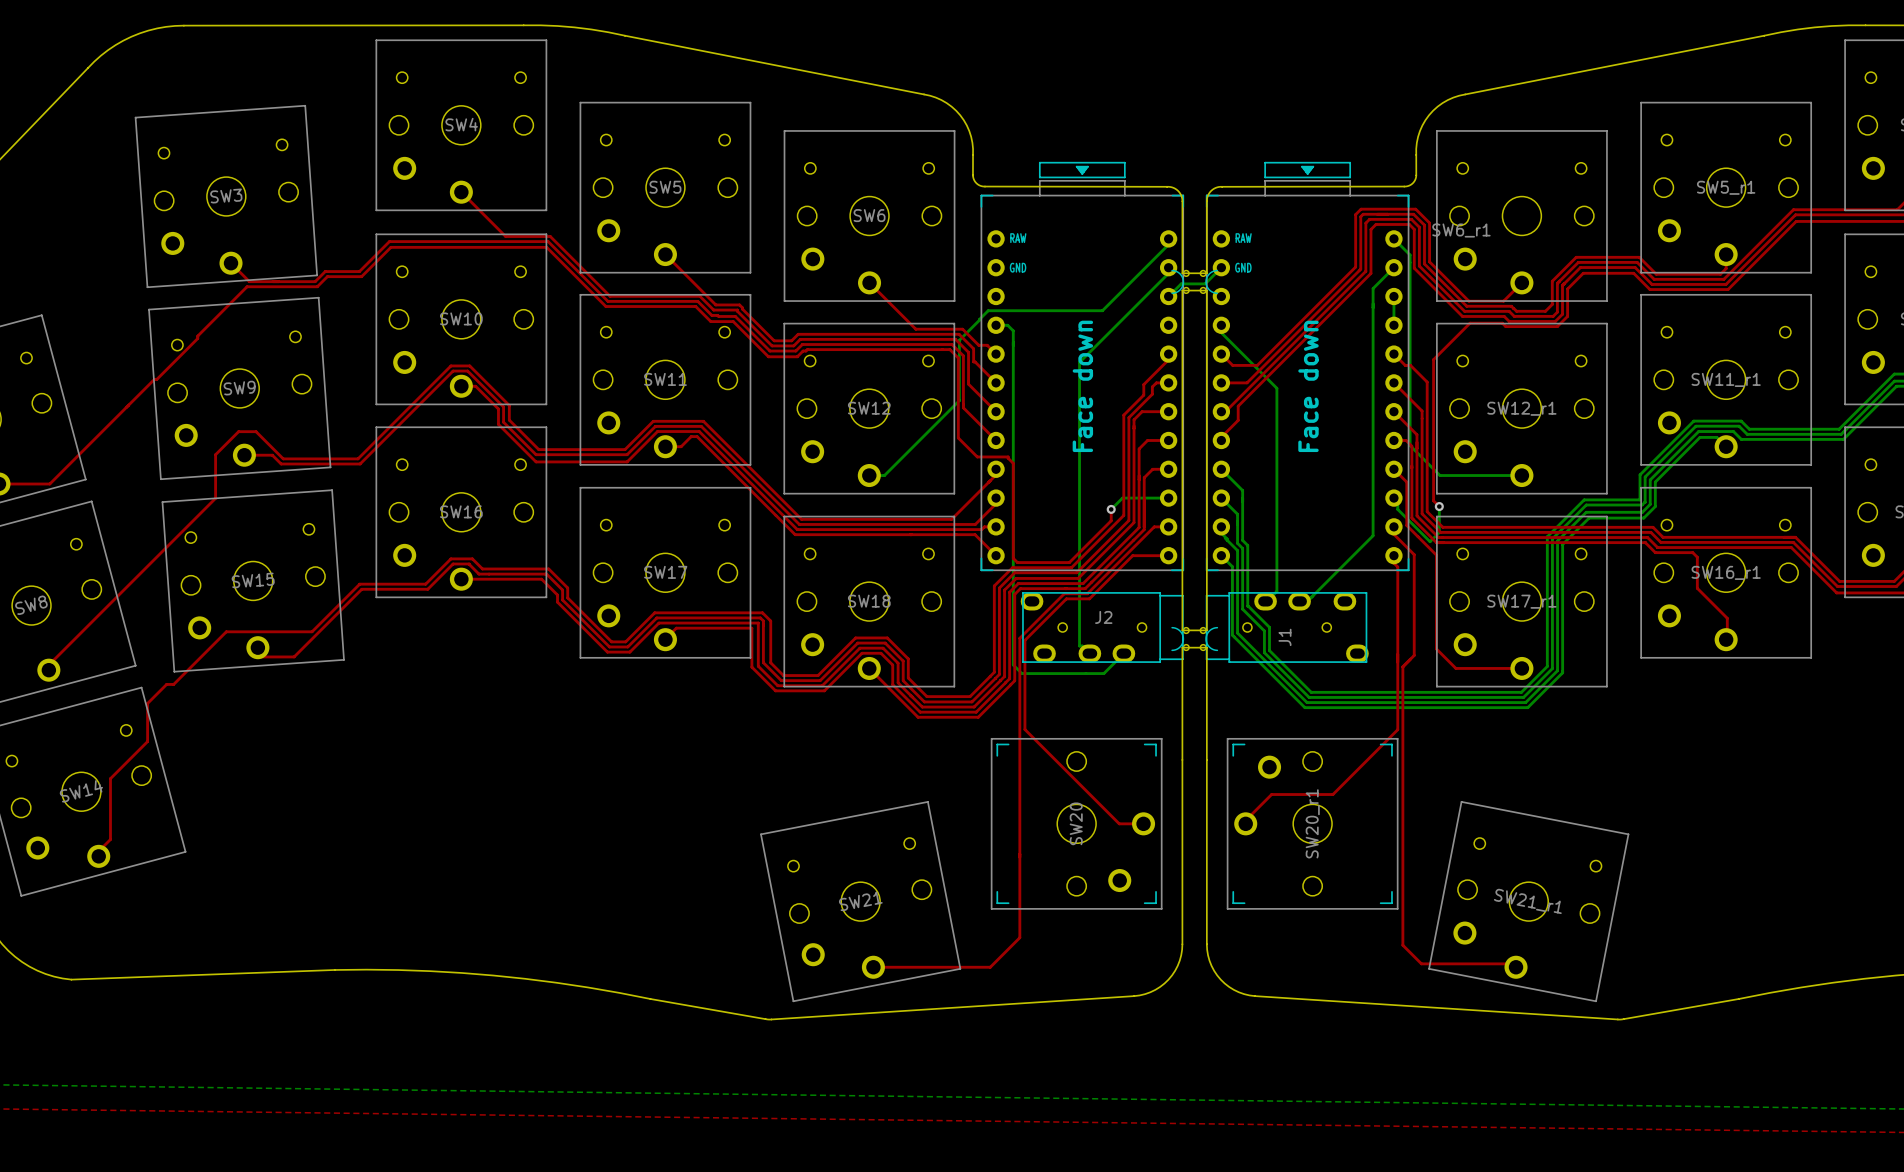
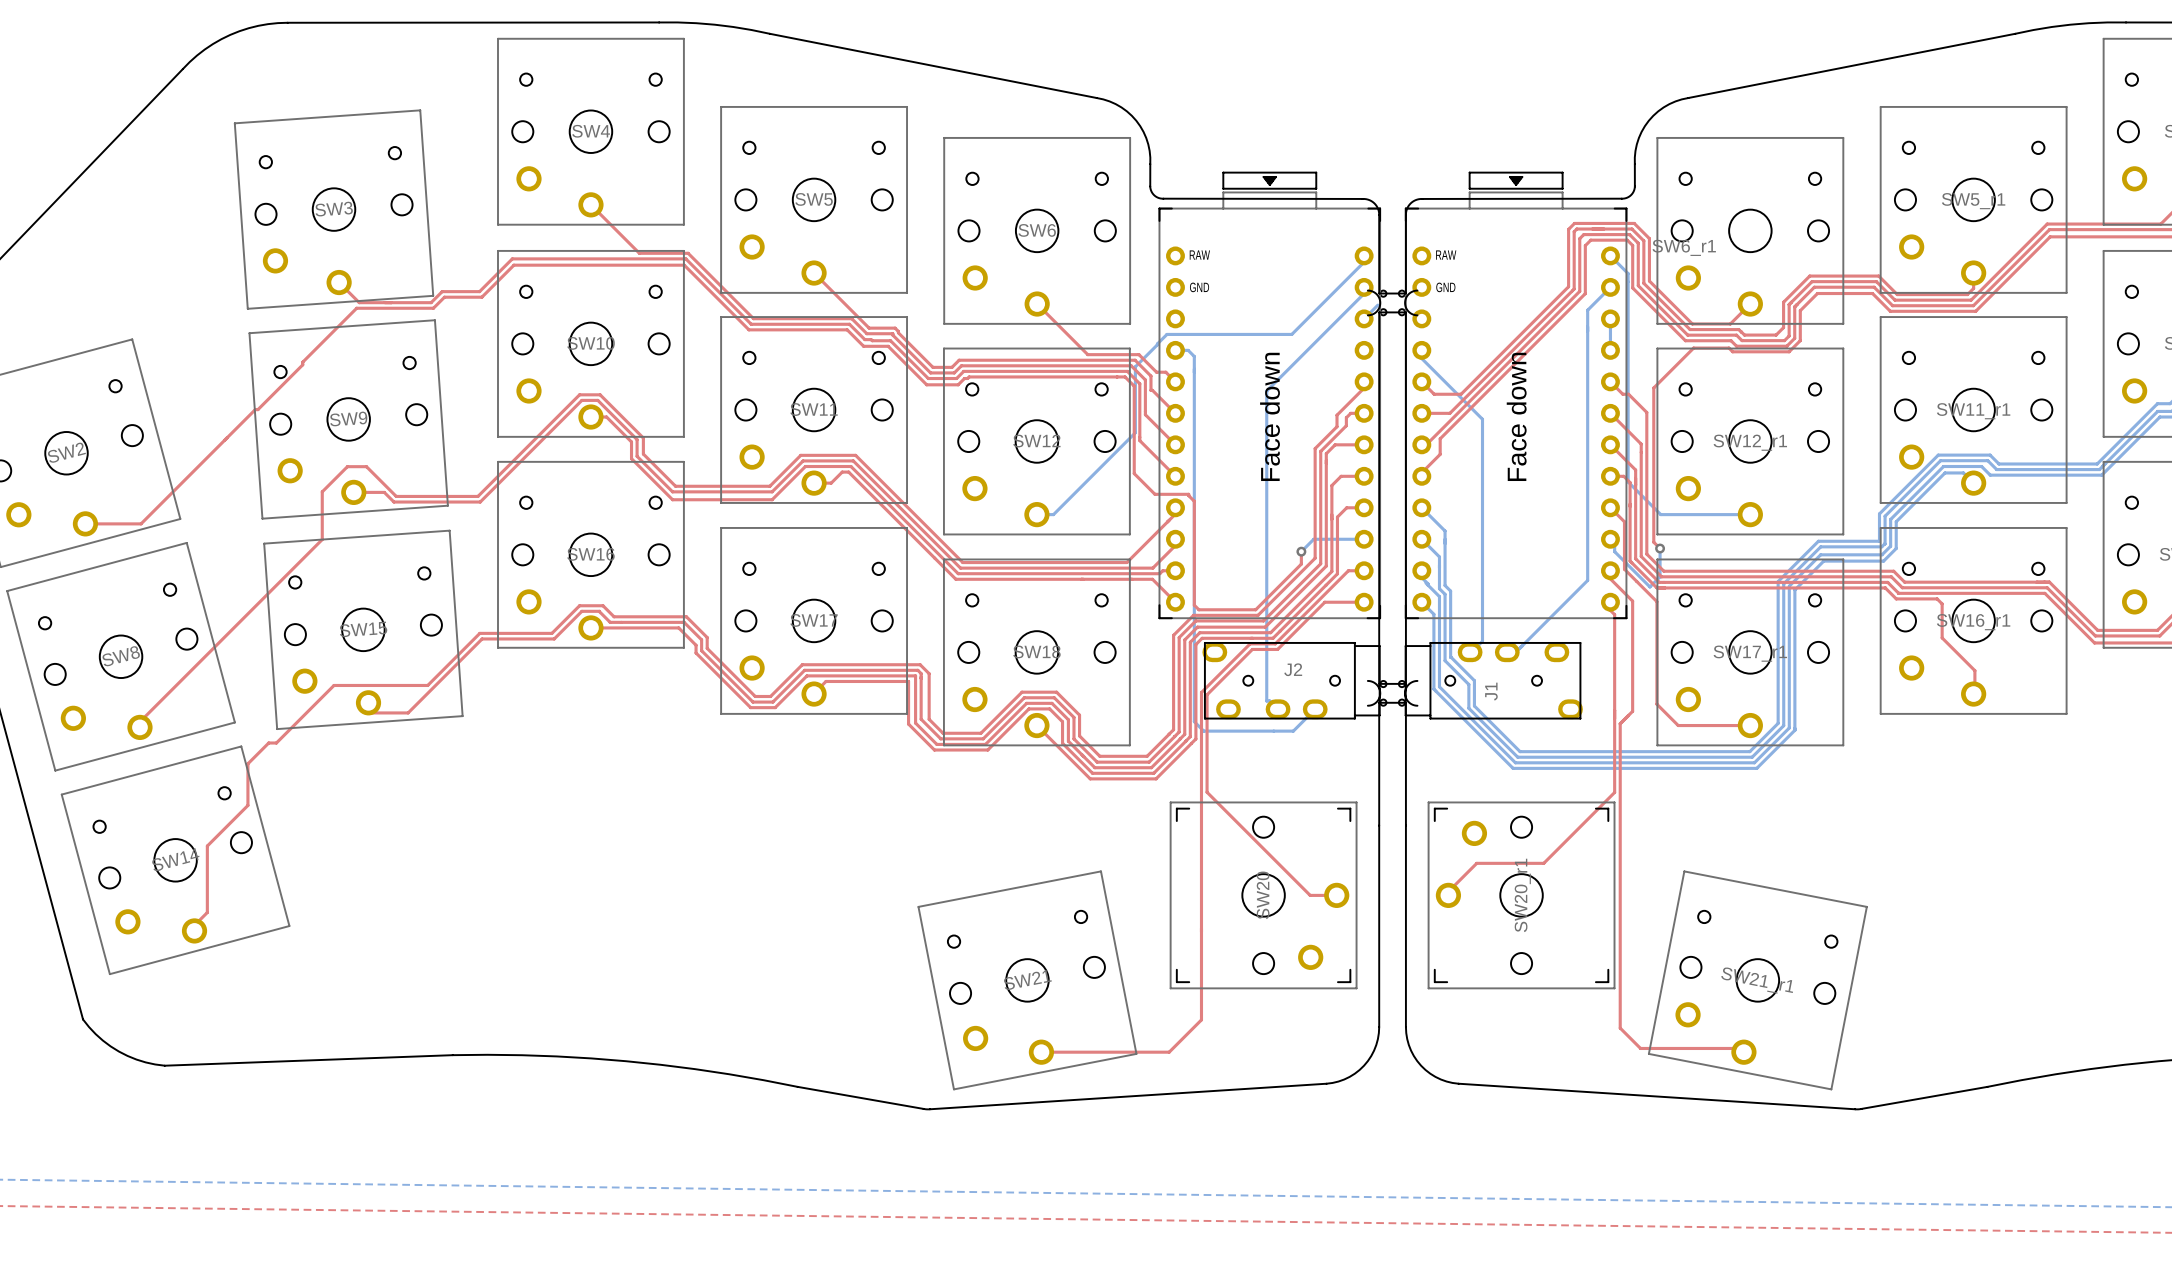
bottom track: (1221, 267) (1205, 283) (1181, 283) -> none

